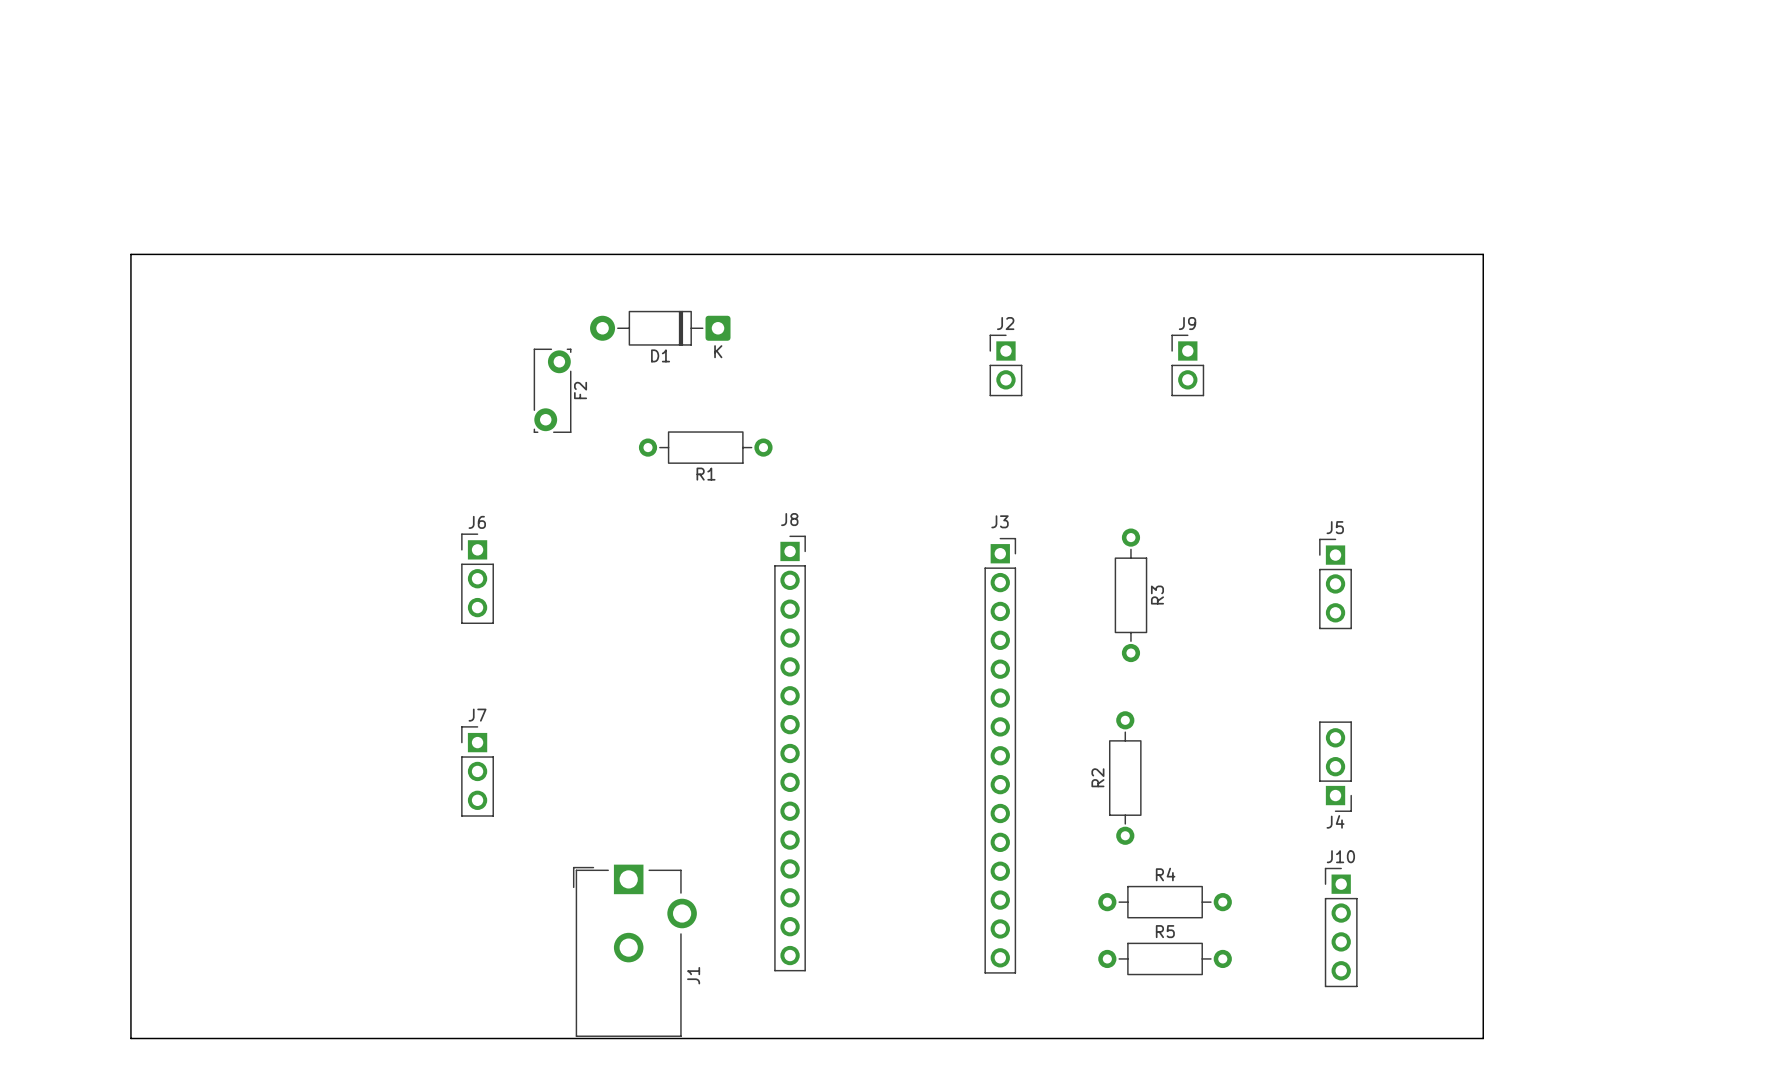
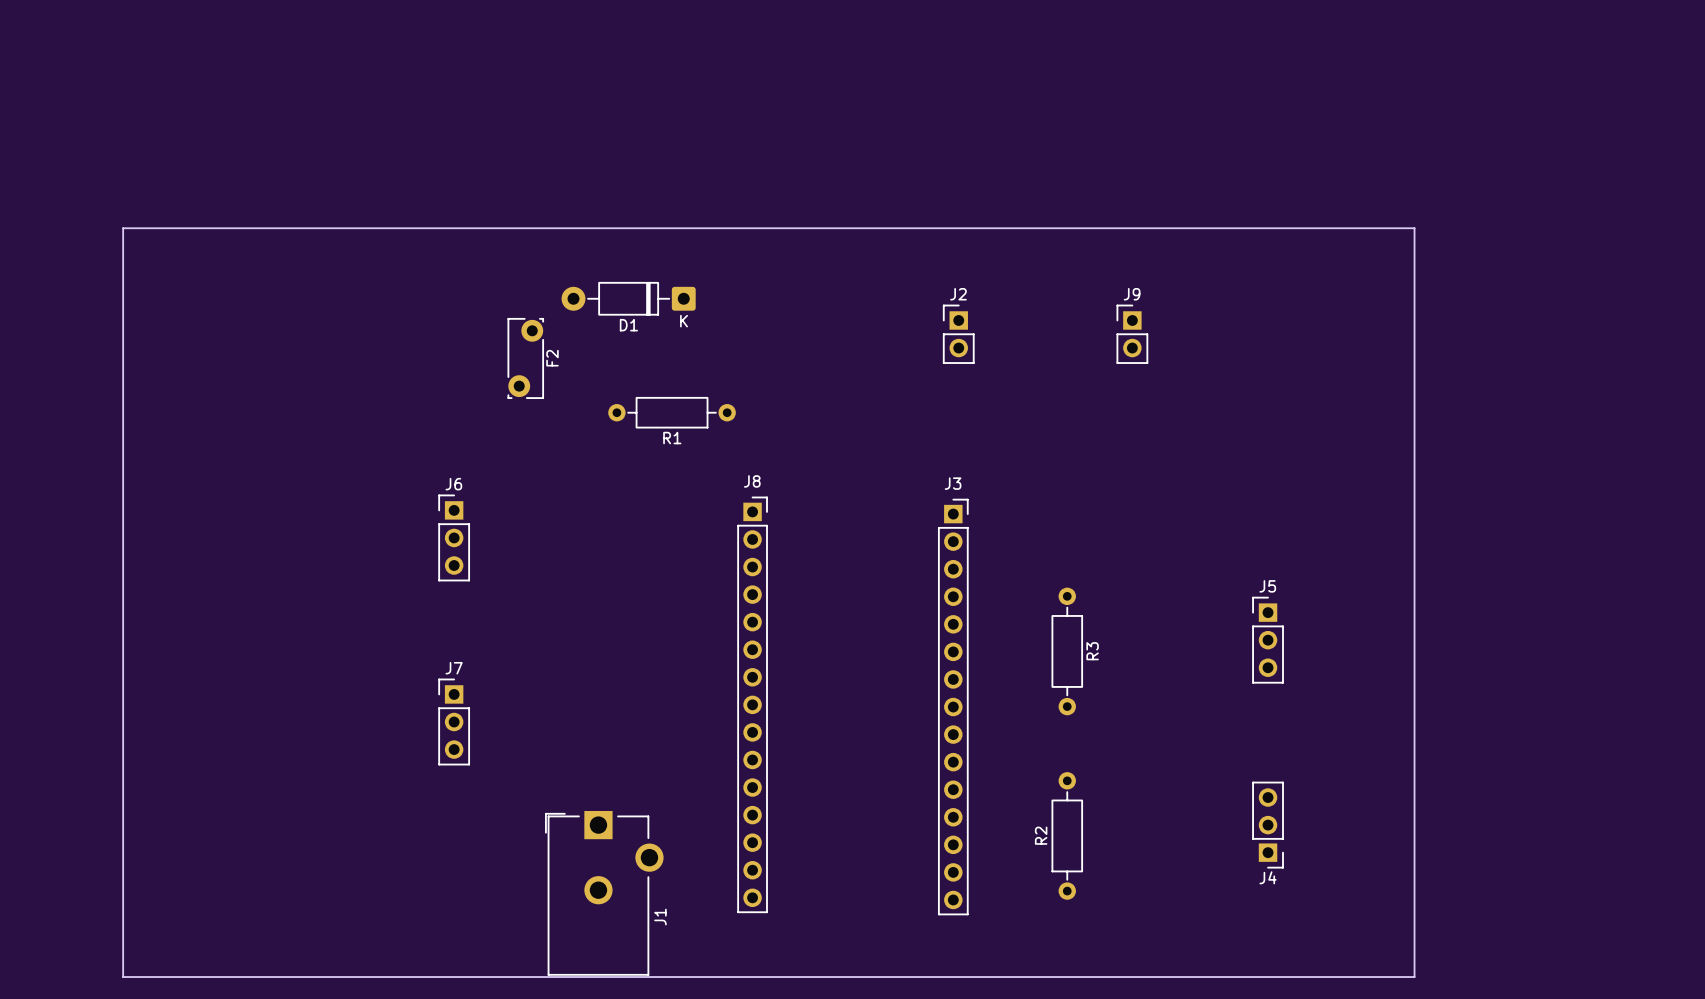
J5 position: (1335, 583) -> (1268, 640)
R3 position: (1130, 595) -> (1067, 651)
J4 position: (1335, 766) -> (1268, 825)
R2 position: (1125, 778) -> (1067, 835)
R4: (1165, 902) -> none
J10: (1341, 927) -> none
R5: (1165, 958) -> none

